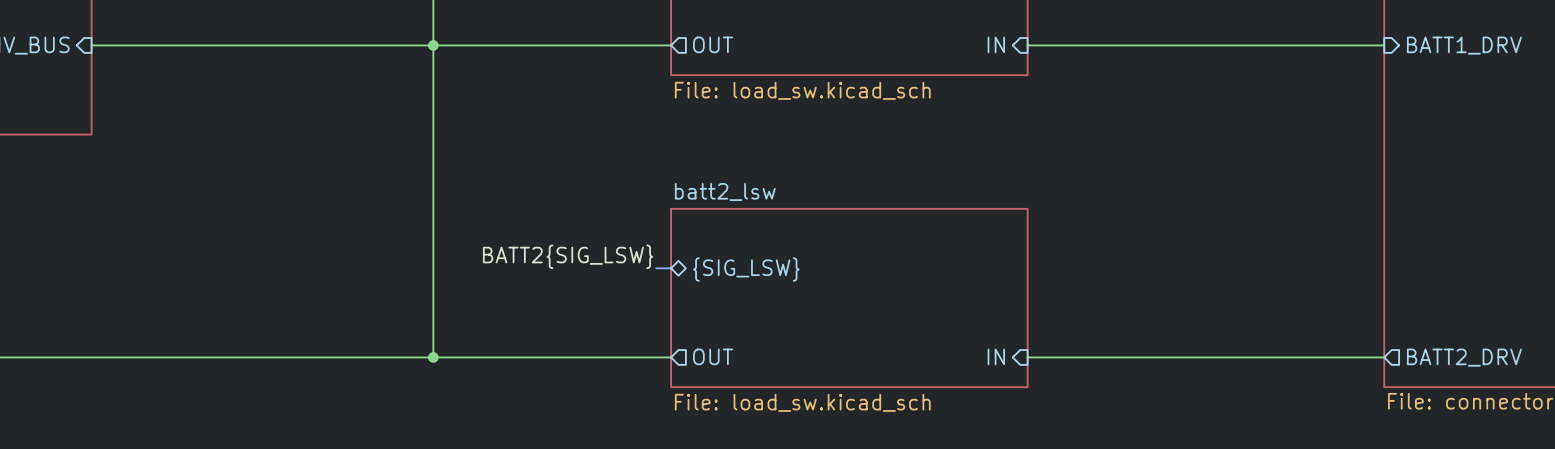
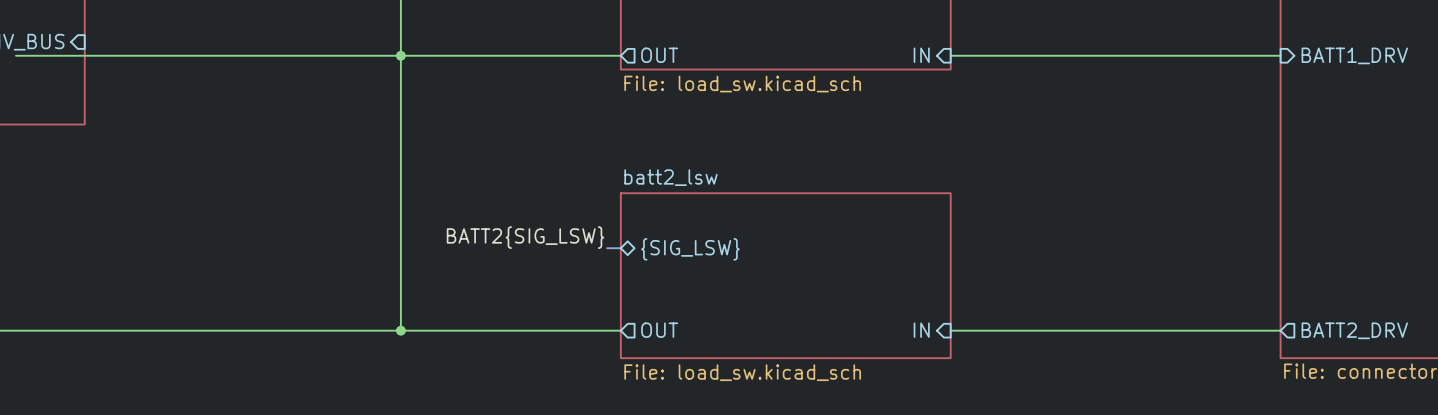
sheet pin position: OUT (713, 44) -> OUT (659, 55)
sheet pin position: IN (996, 44) -> IN (921, 55)
wire: (91, 45) (671, 45) -> none
junction position: (433, 45) -> (400, 55)
wire: (1027, 45) (1384, 45) -> (950, 55) (1280, 55)
sheet pin position: BATT1_DRV (1464, 45) -> BATT1_DRV (1354, 55)
wire: none -> (16, 55) (620, 55)

